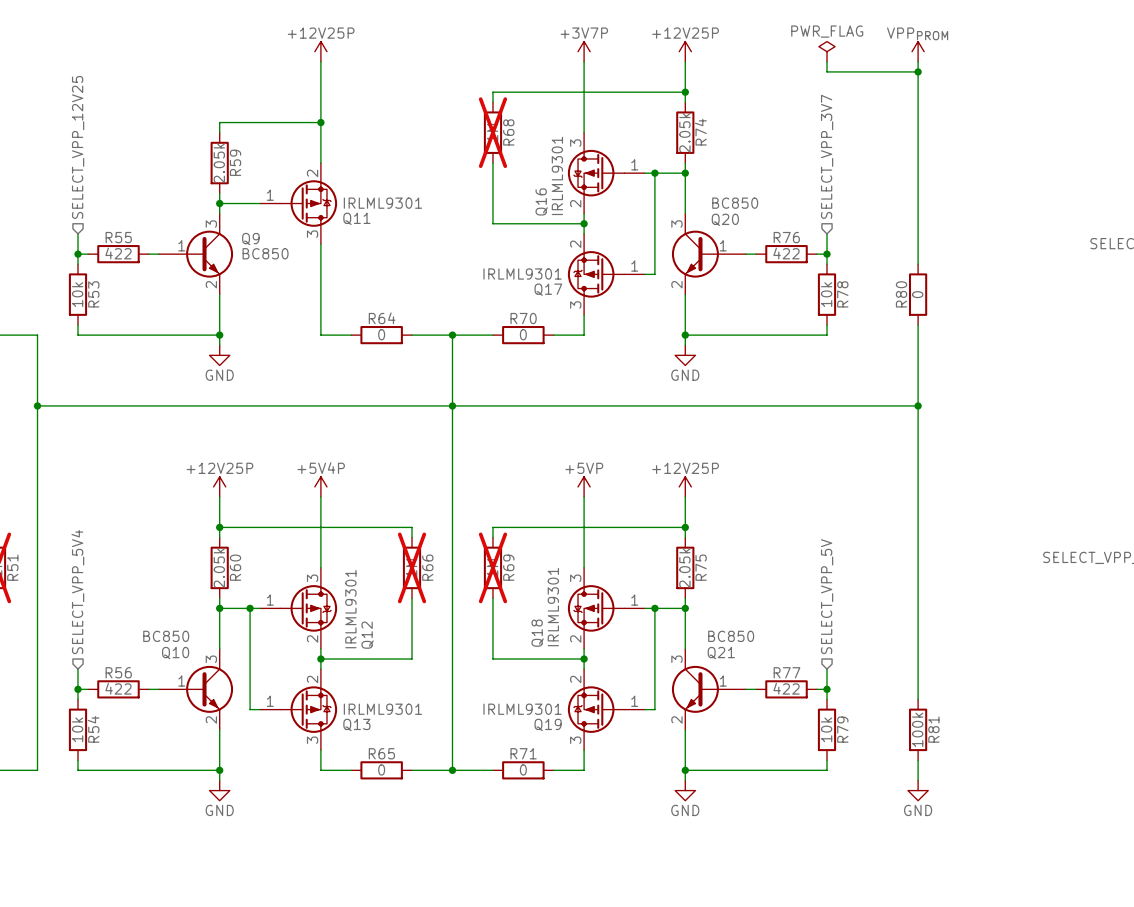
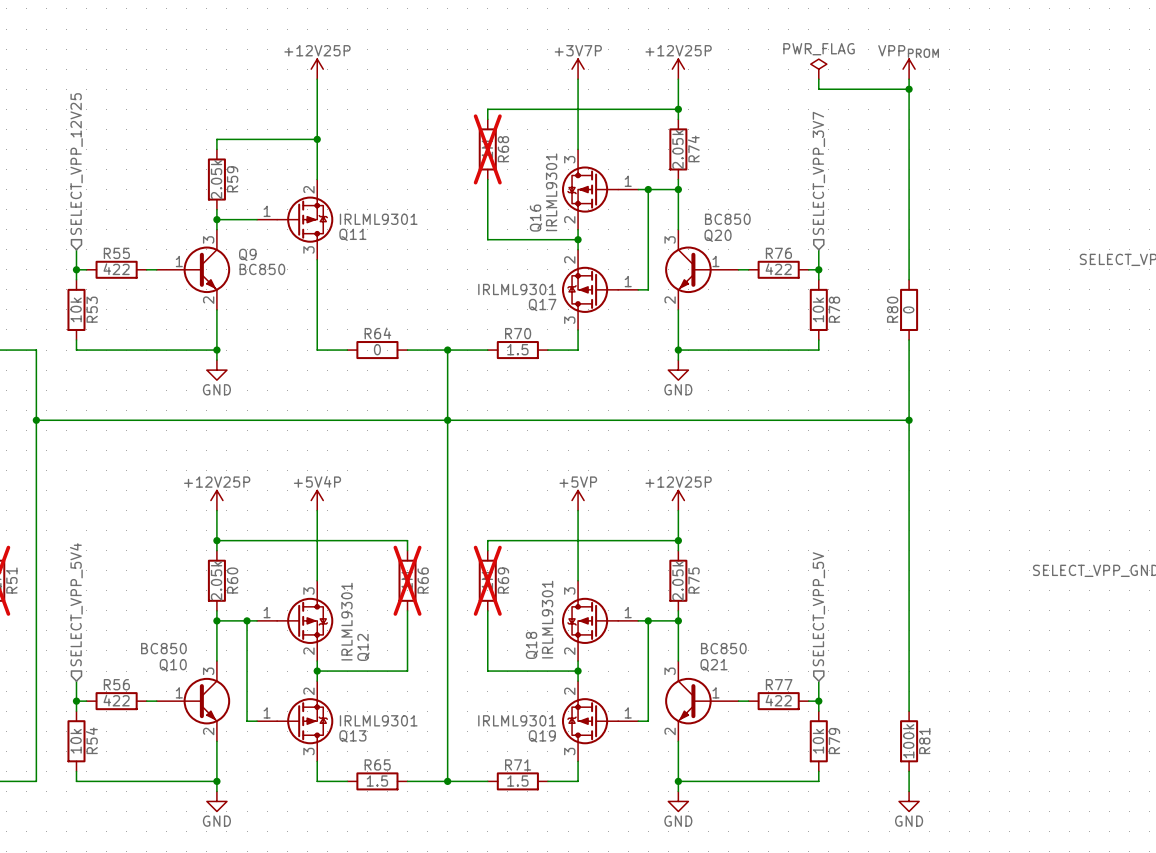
R70 value: 0 (523, 334) -> 1.5 (517, 349)
R65 value: 0 (381, 769) -> 1.5 (377, 781)
R71 value: 0 (523, 769) -> 1.5 (517, 781)

